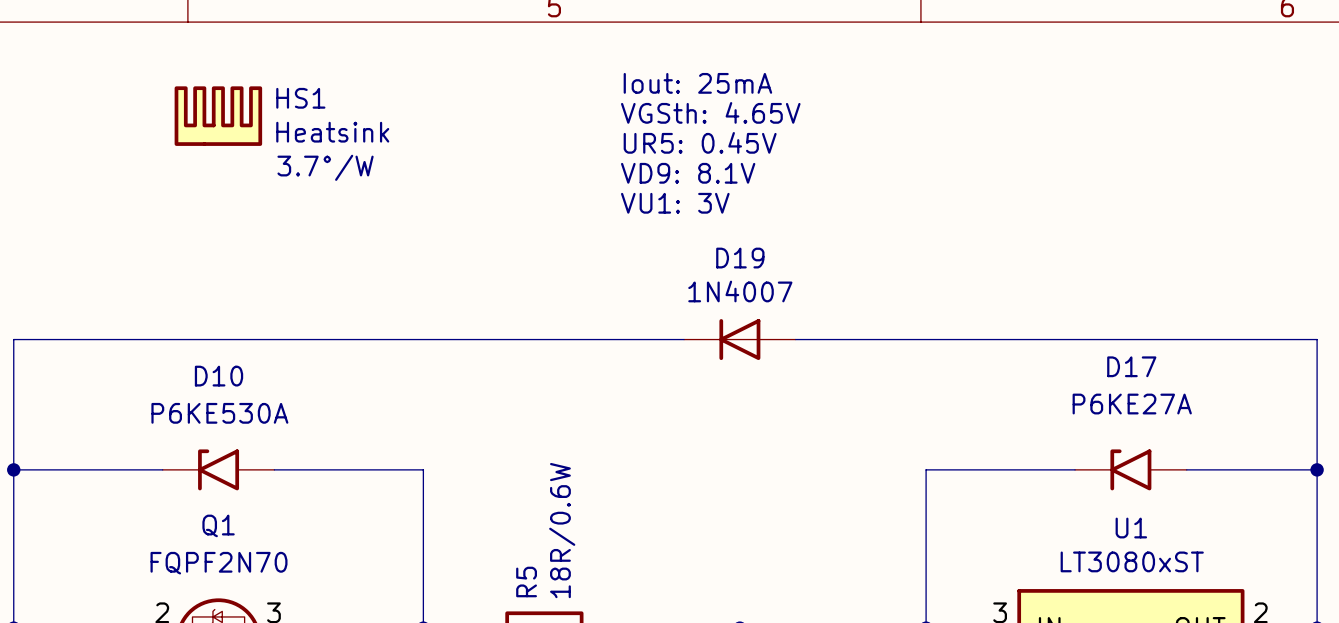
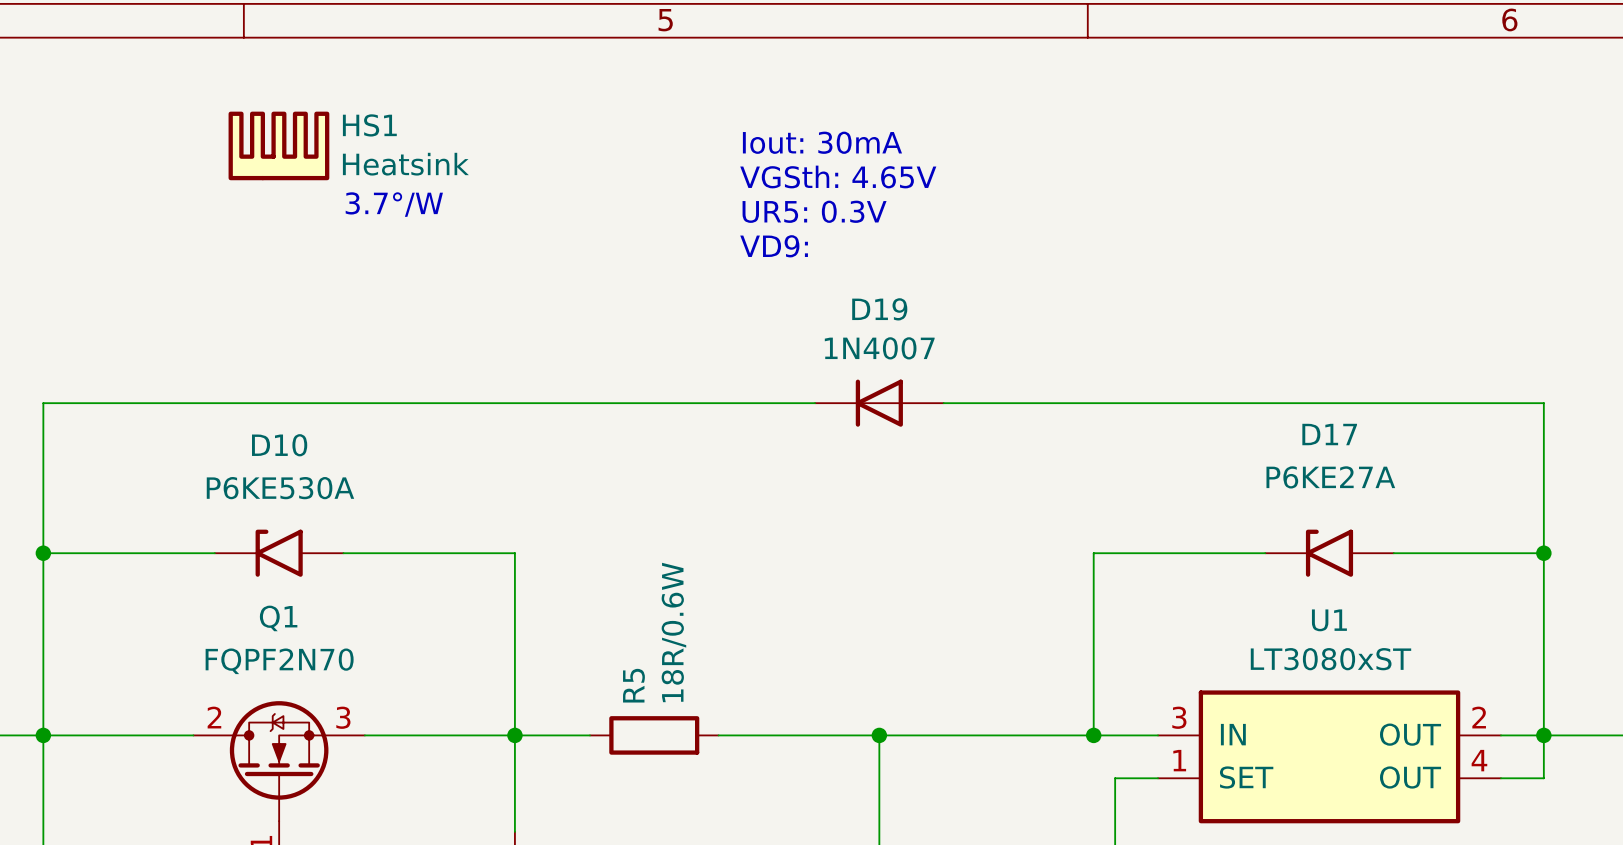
text: Iout: 25mA (697, 83) -> none
text: VGSth: 4.65V (710, 112) -> Iout: 30mA (822, 142)
text: UR5: 0.45V (700, 142) -> VGSth: 4.65V (838, 177)
text: VD9: 8.1V (688, 173) -> UR5: 0.3V (814, 211)
text: VU1: 3V (675, 203) -> VD9: (774, 246)

